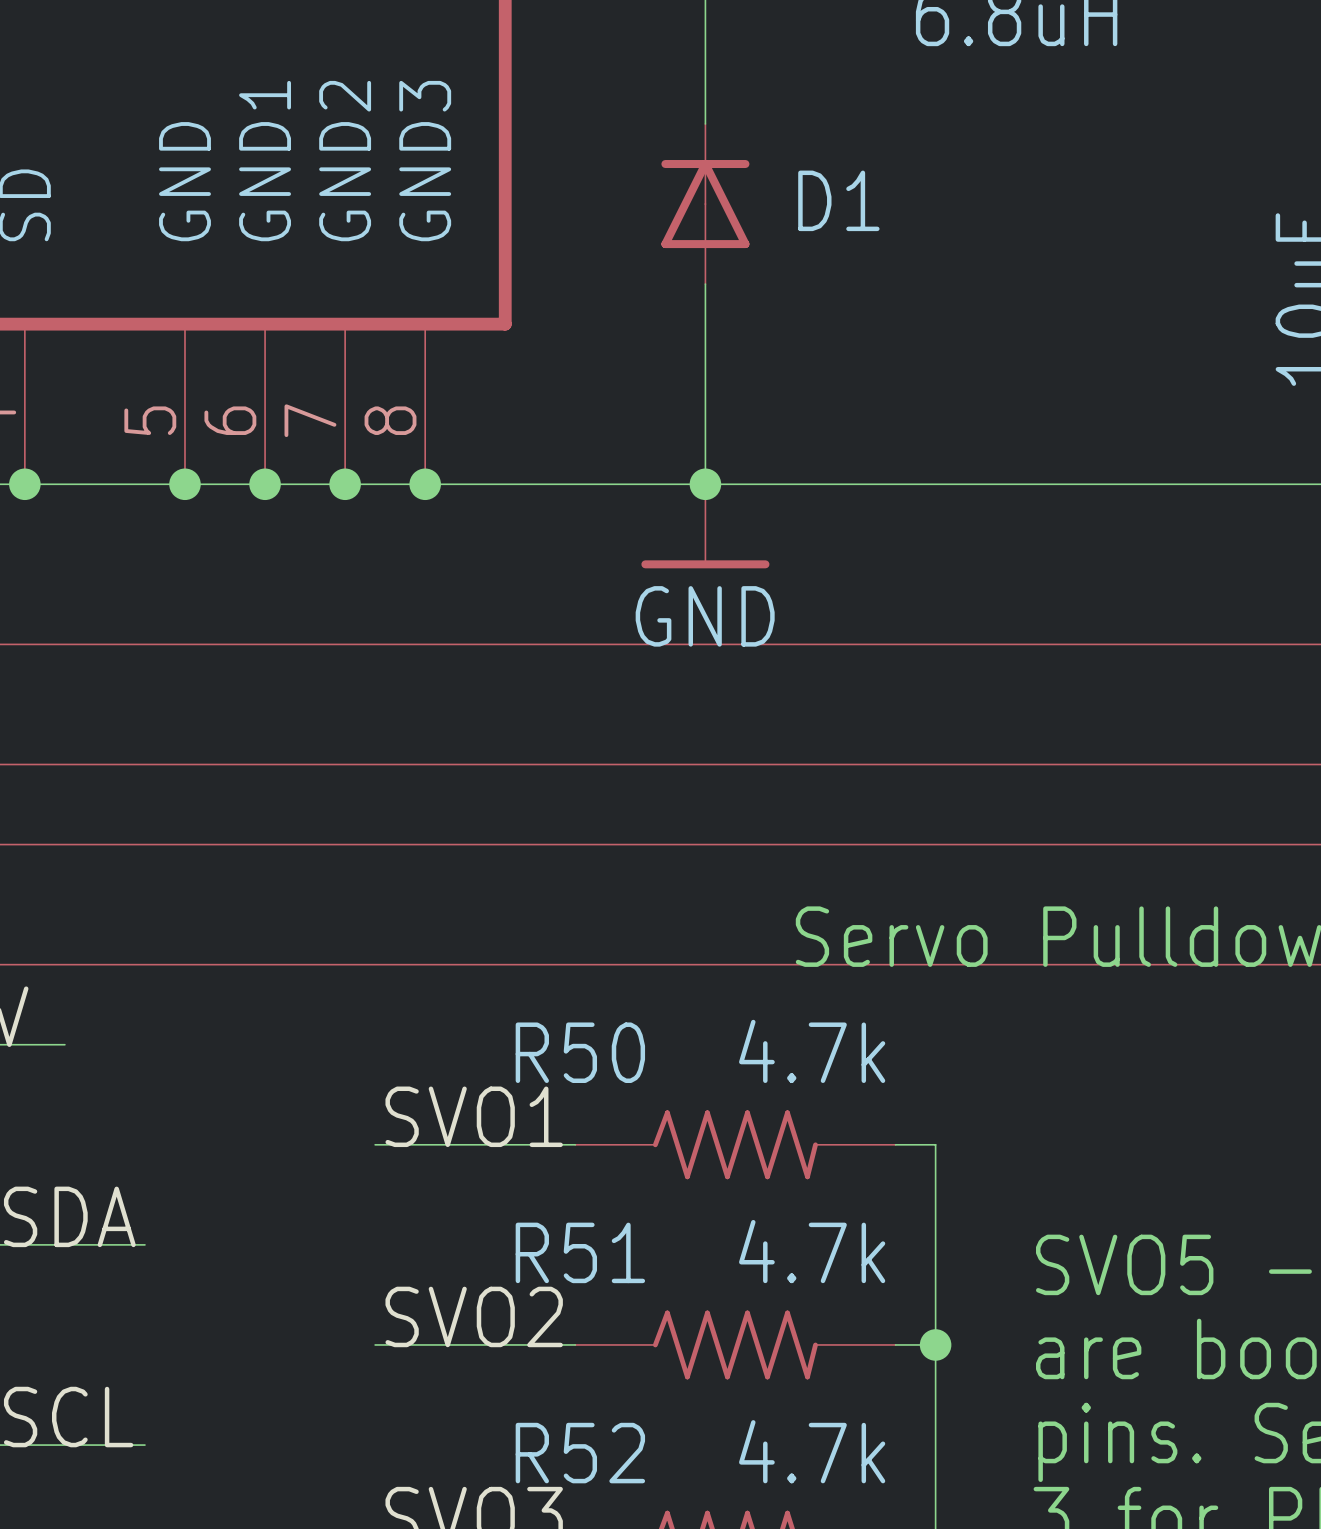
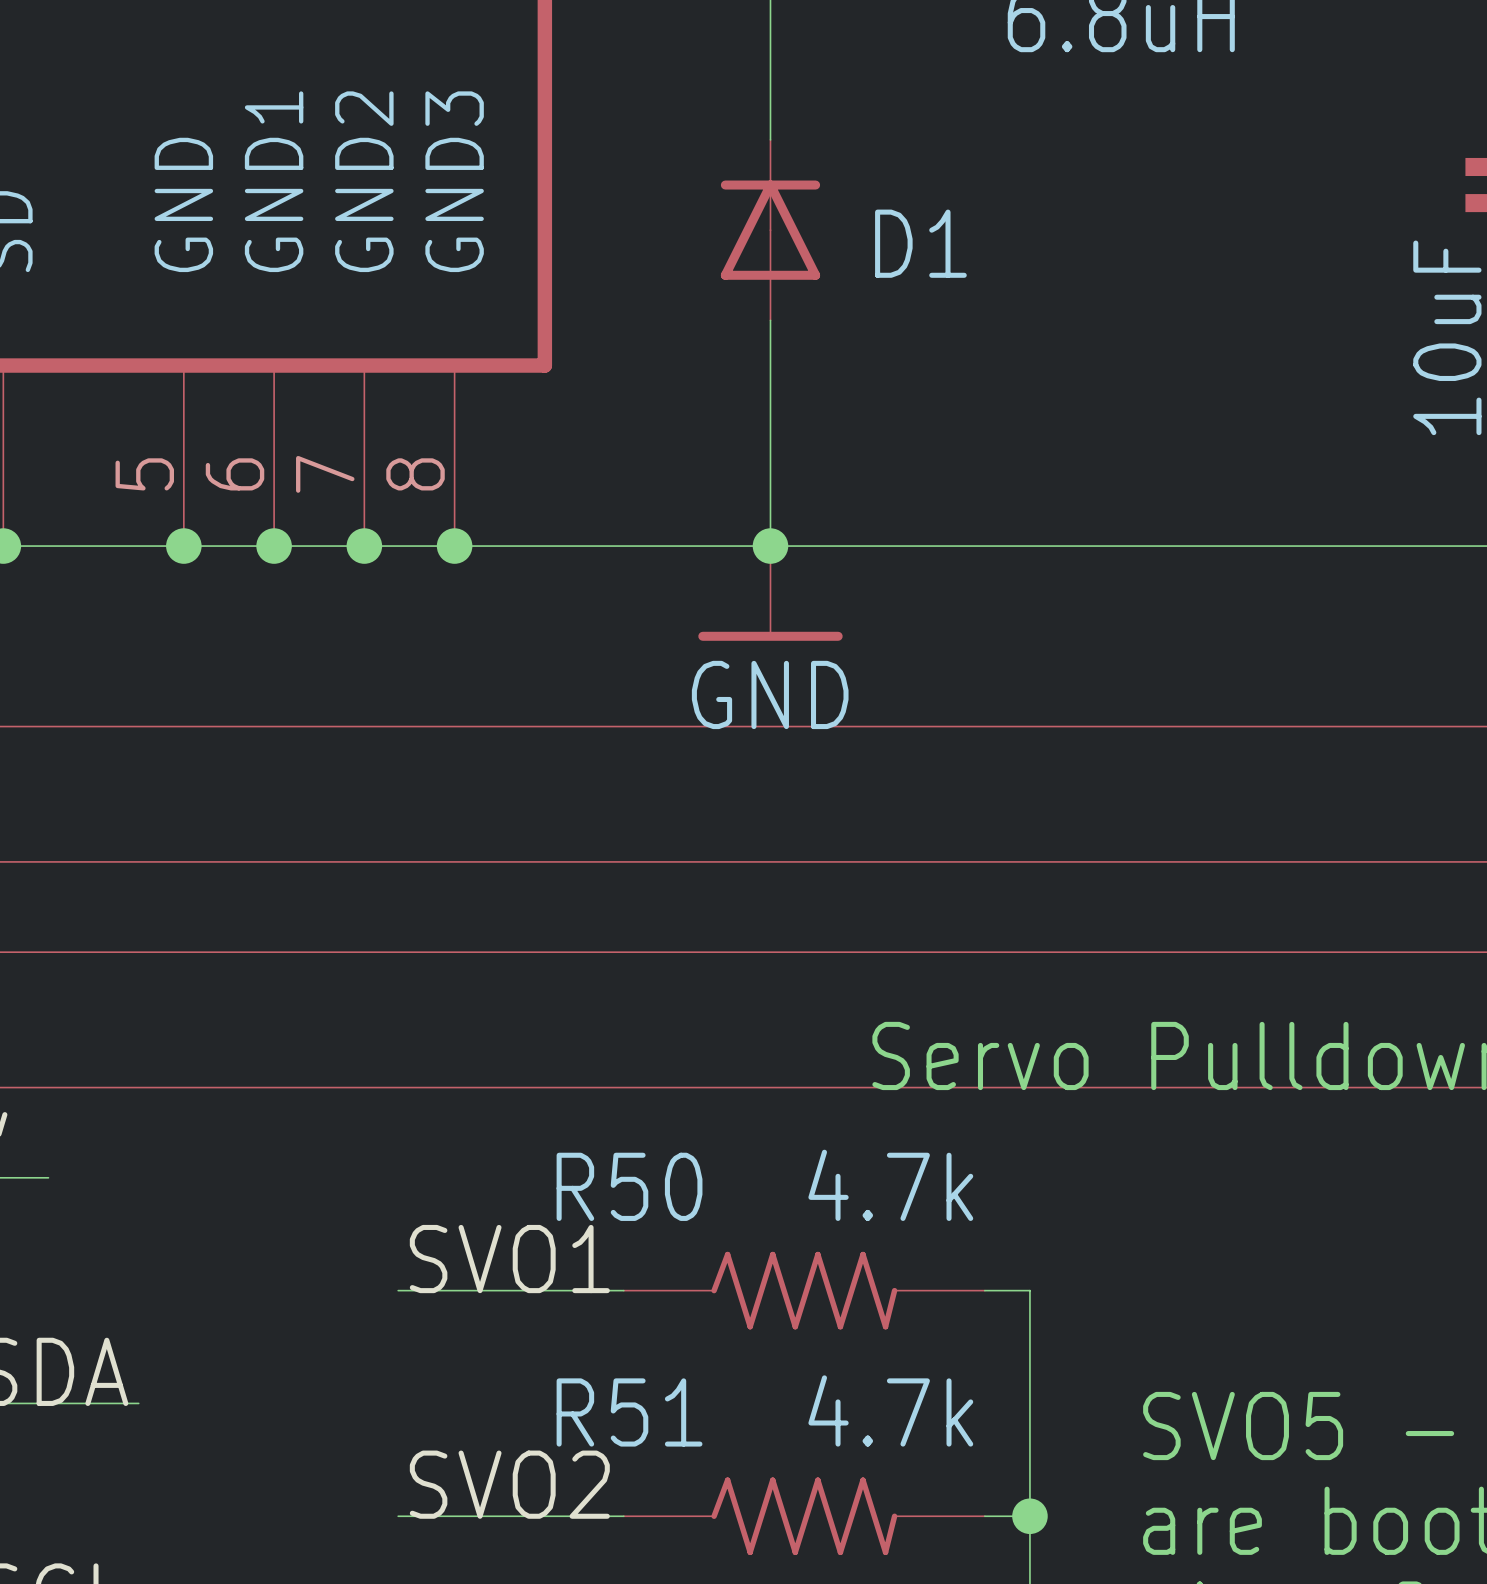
D1 name position: D1 (838, 200) -> D1 (920, 243)

